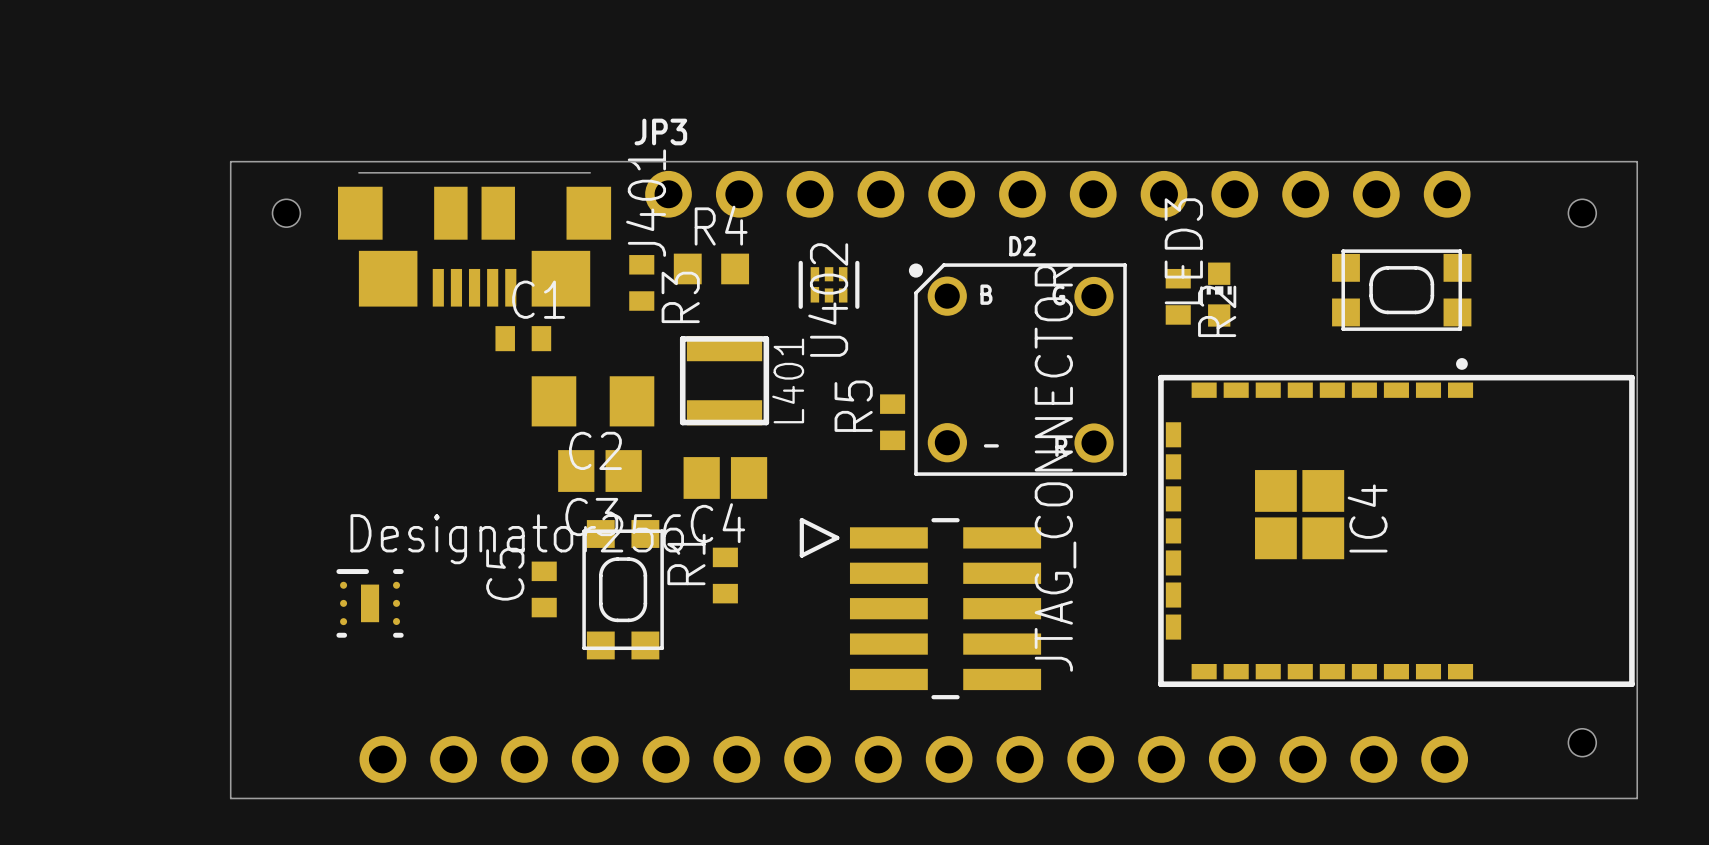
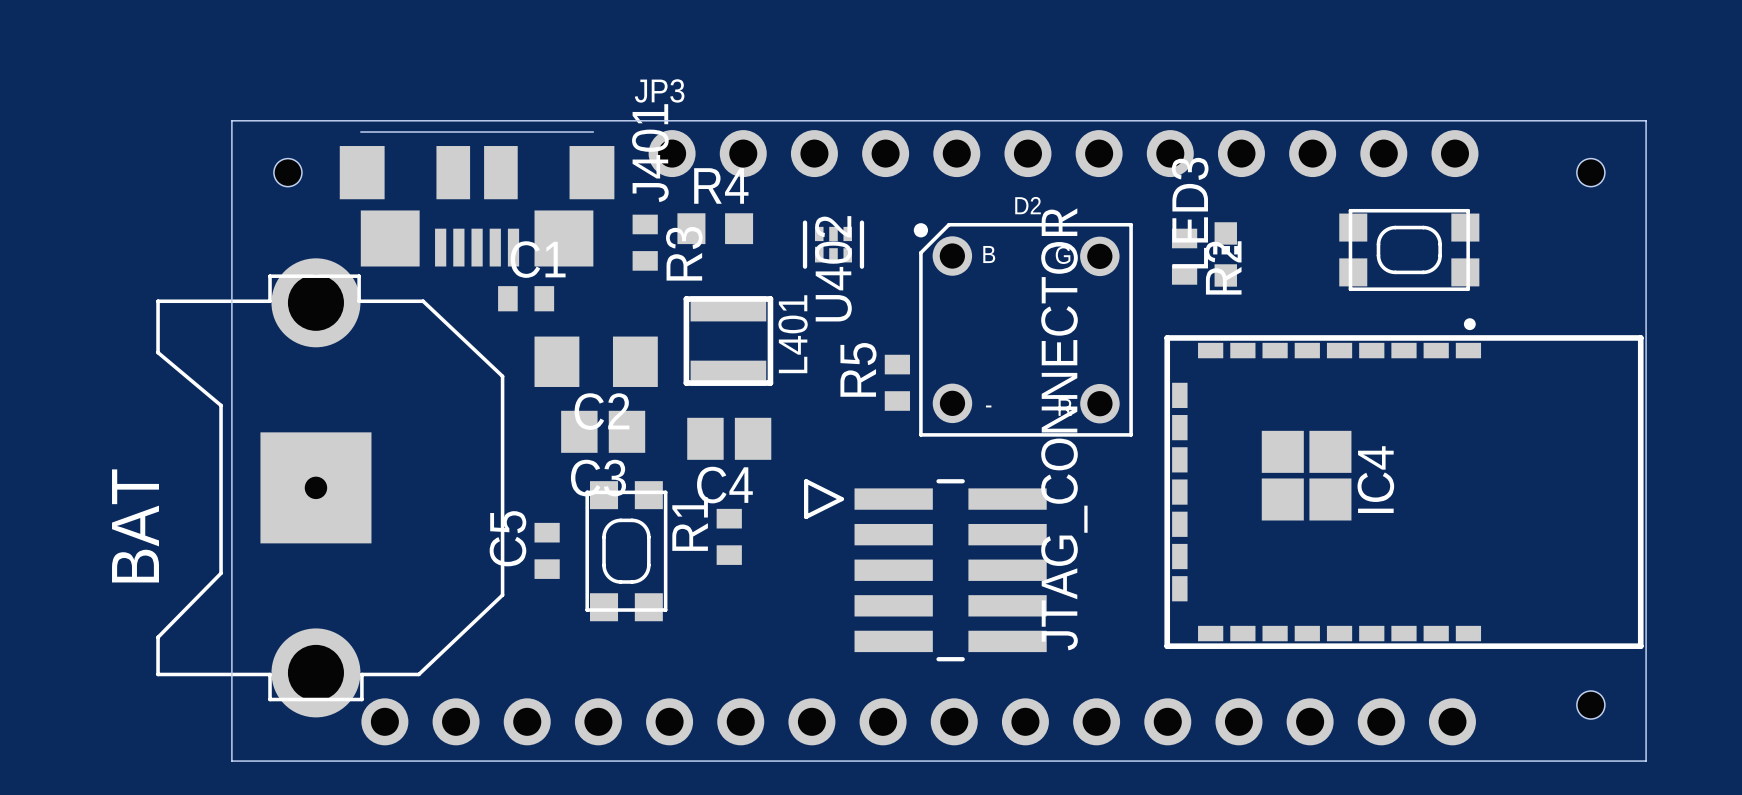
BAT: none -> (330, 487)
part: (370, 603) -> none

